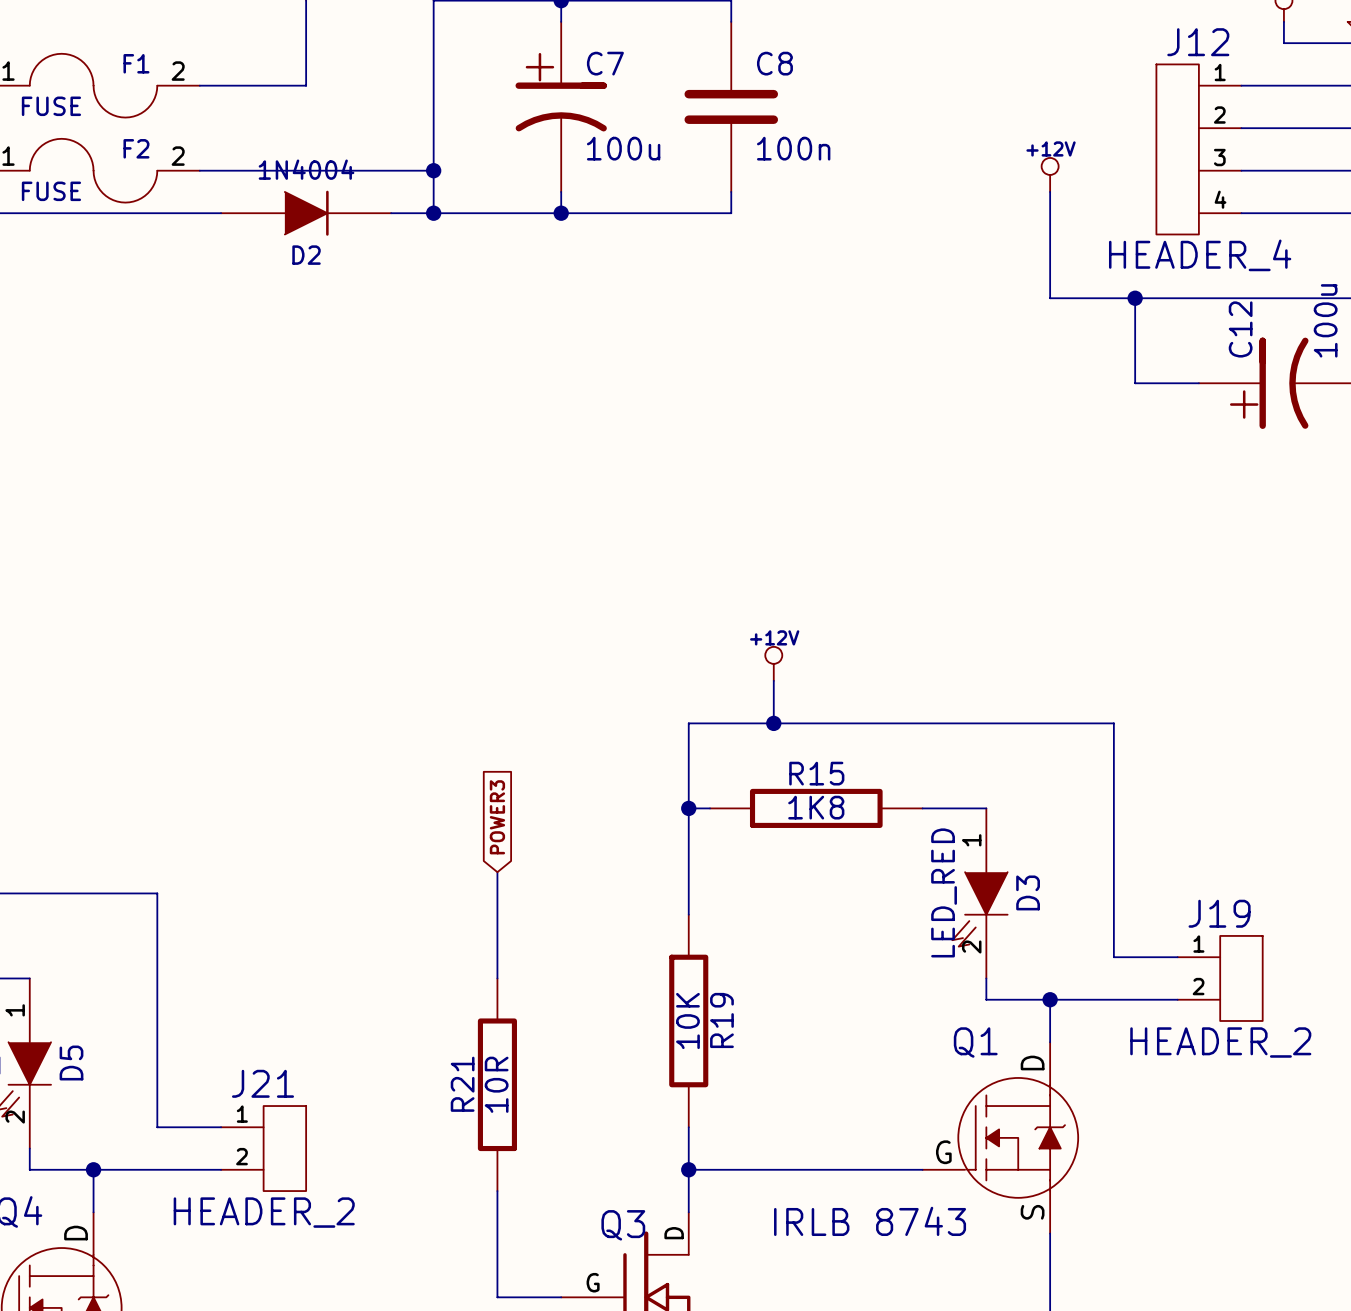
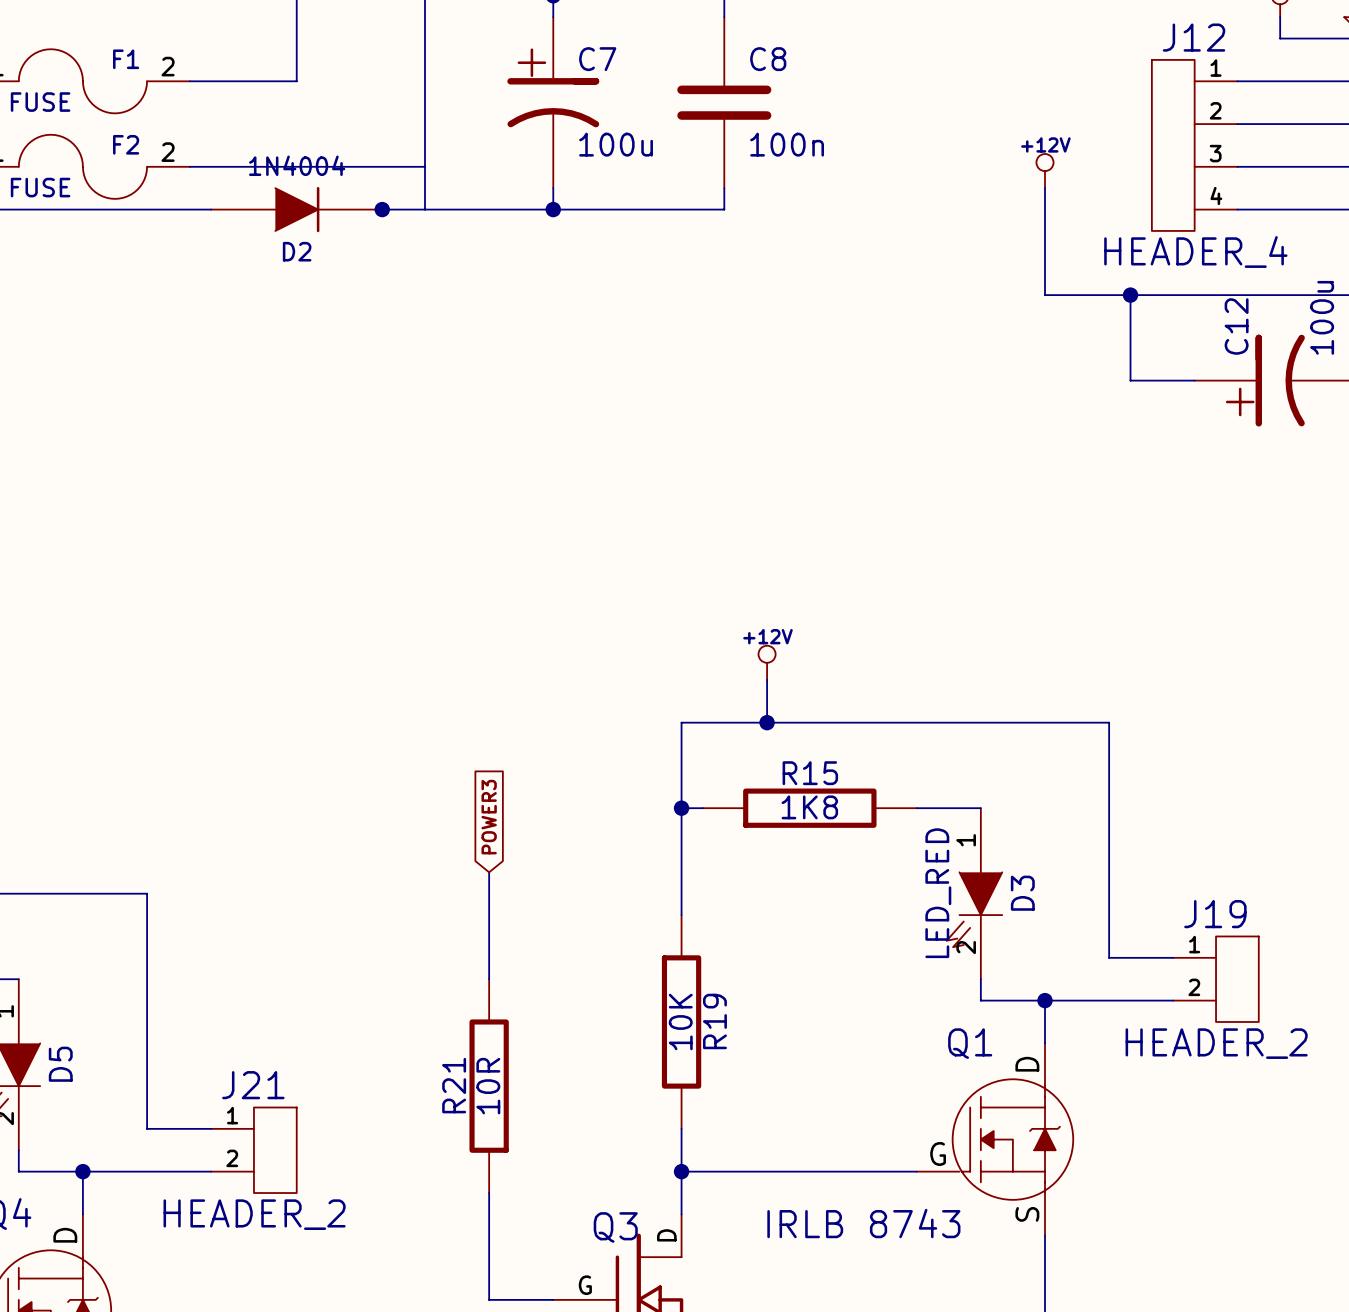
junction: (433, 170) -> none
junction: none -> (382, 209)
junction: (433, 213) -> none

